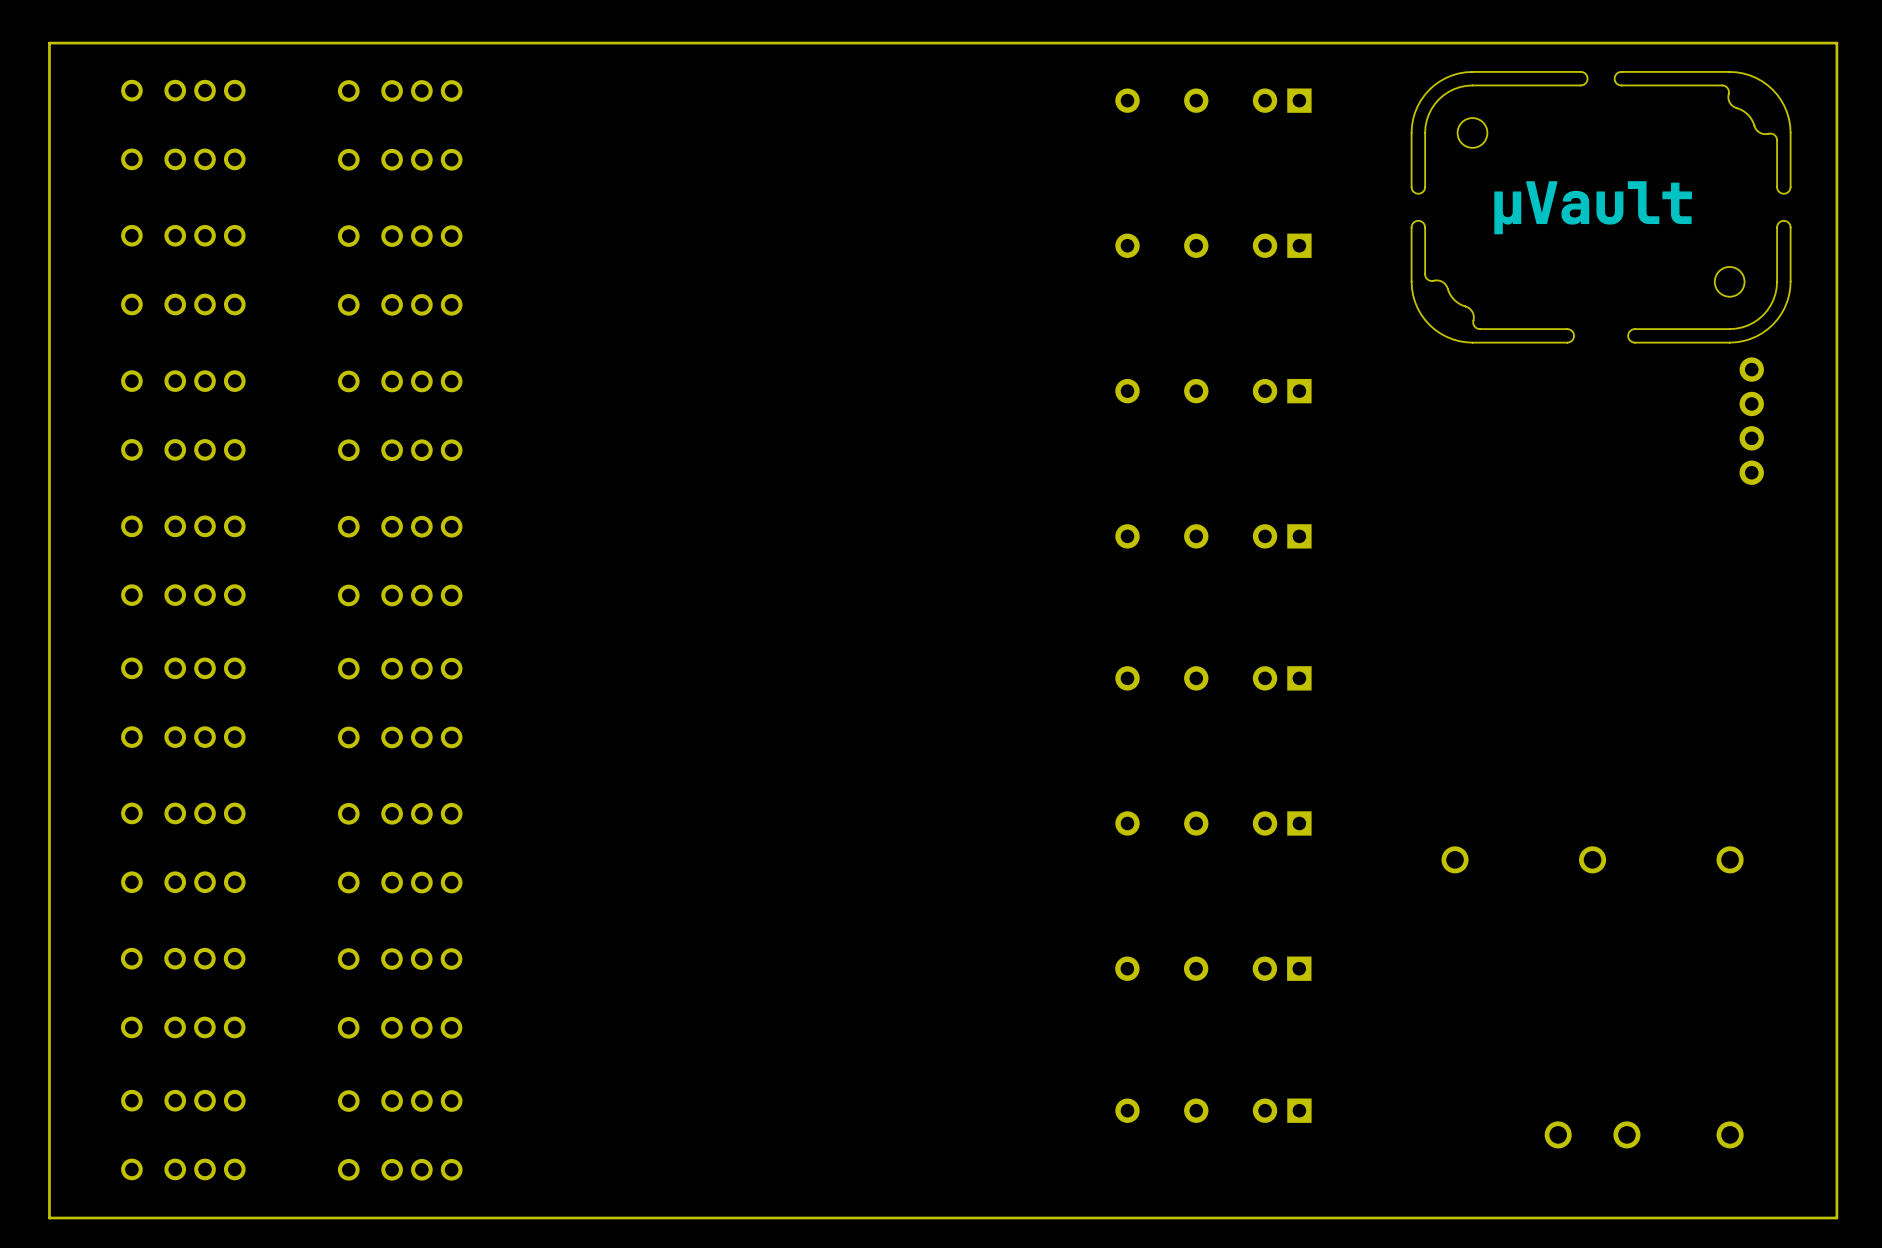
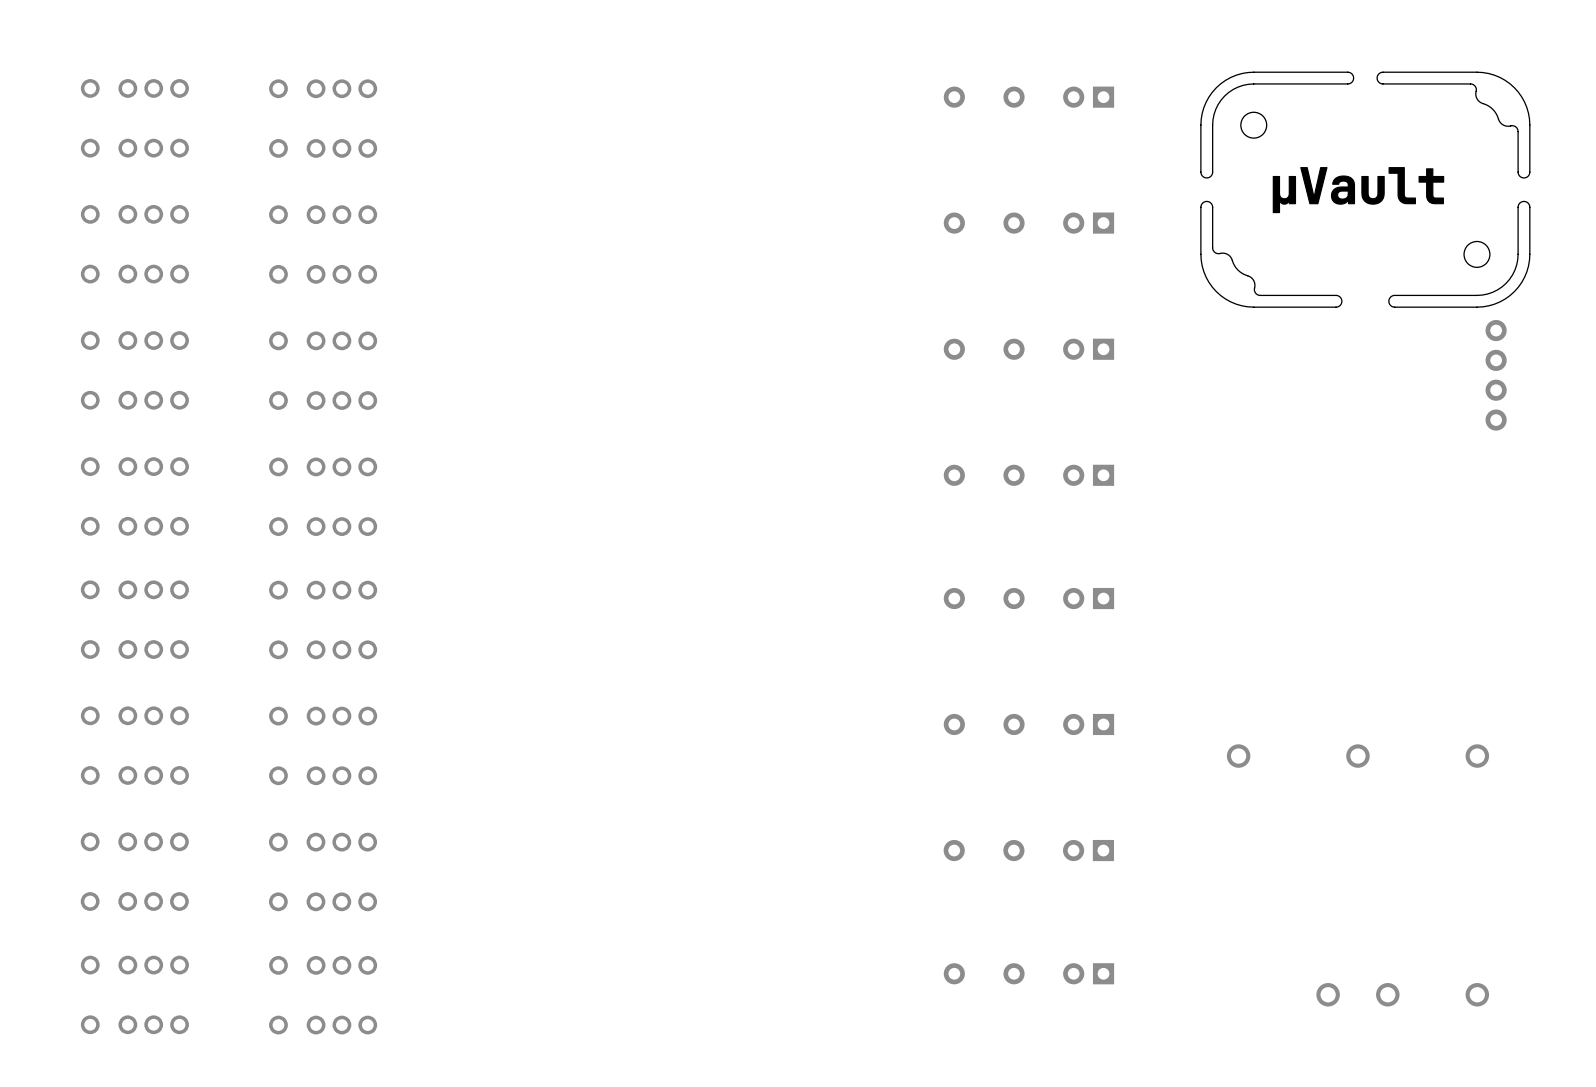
board edge: (1836, 43) (49, 43) (49, 1218) (1836, 1218) (1836, 43) -> none

